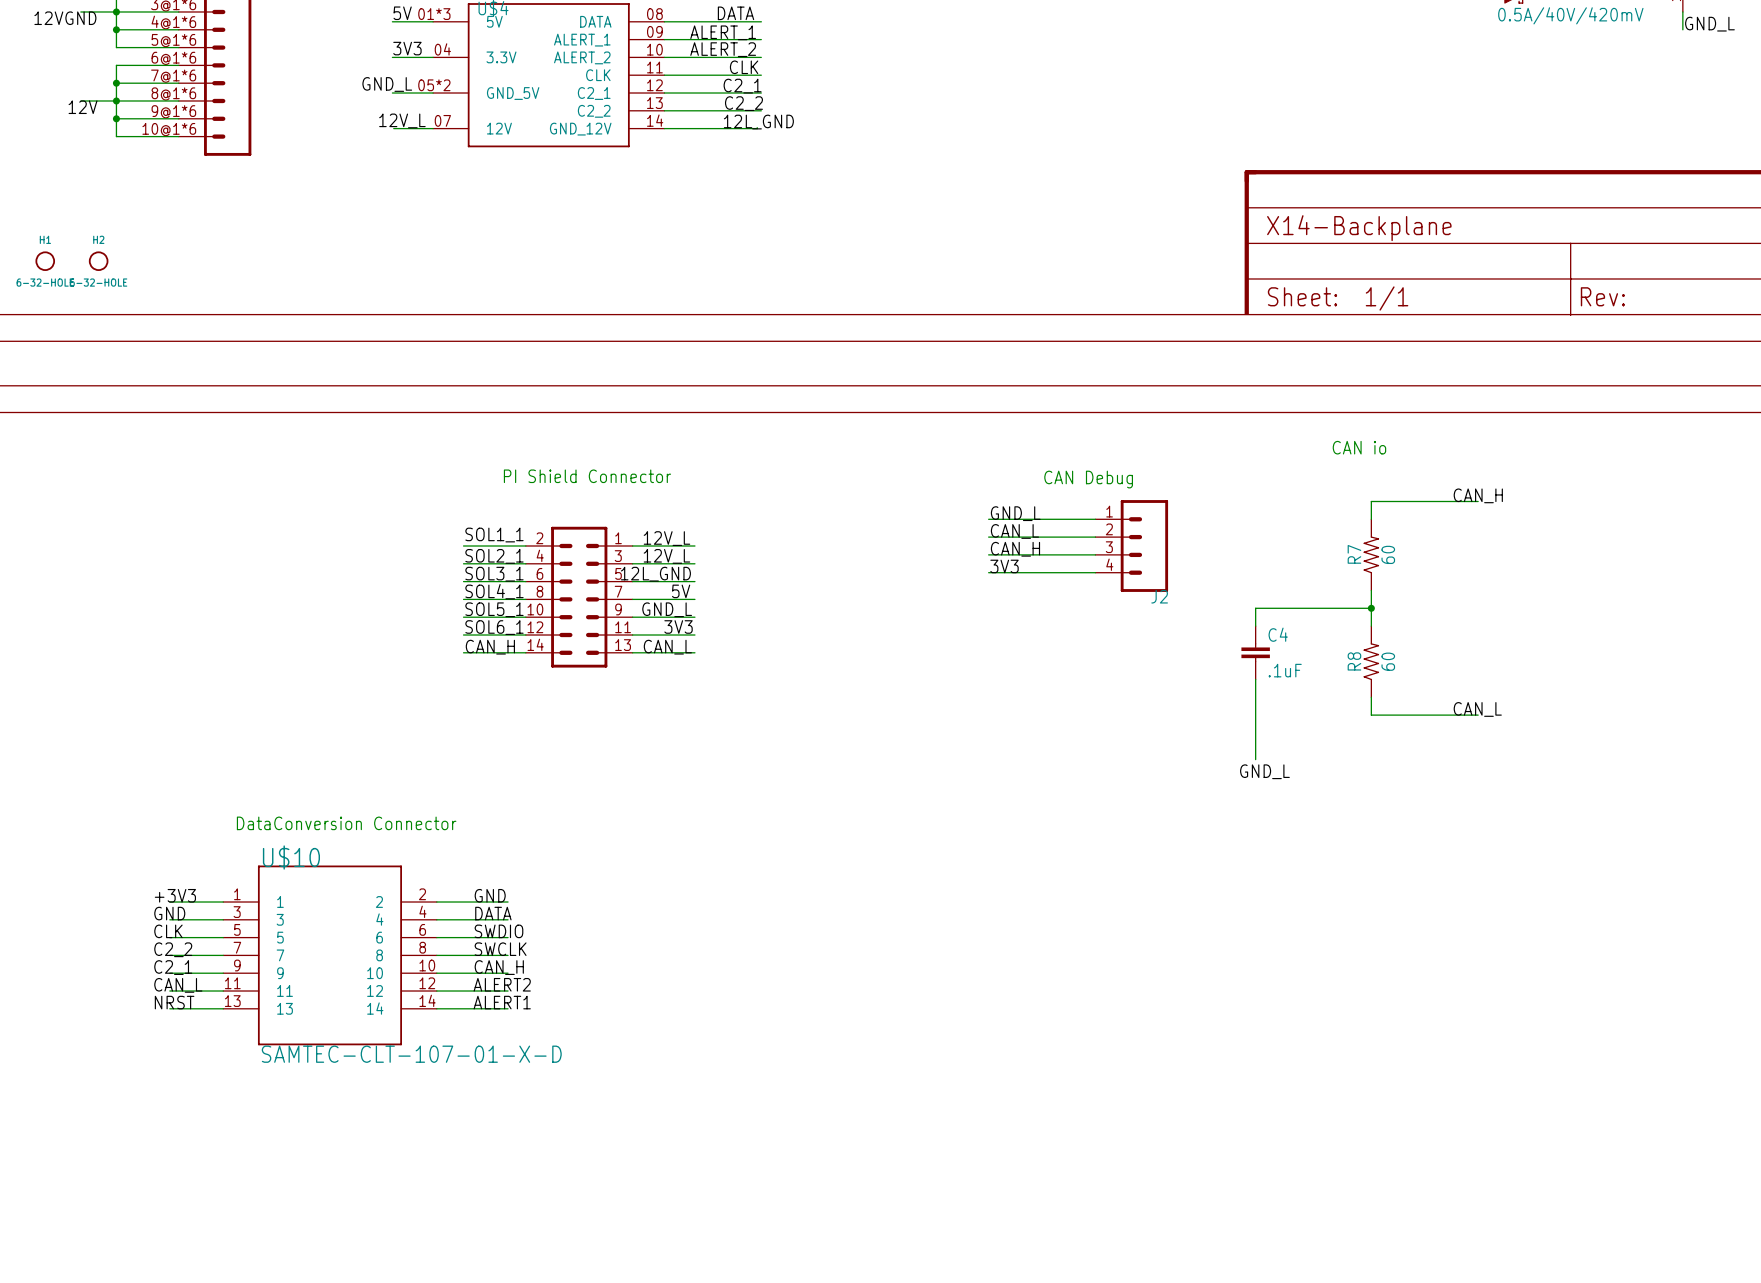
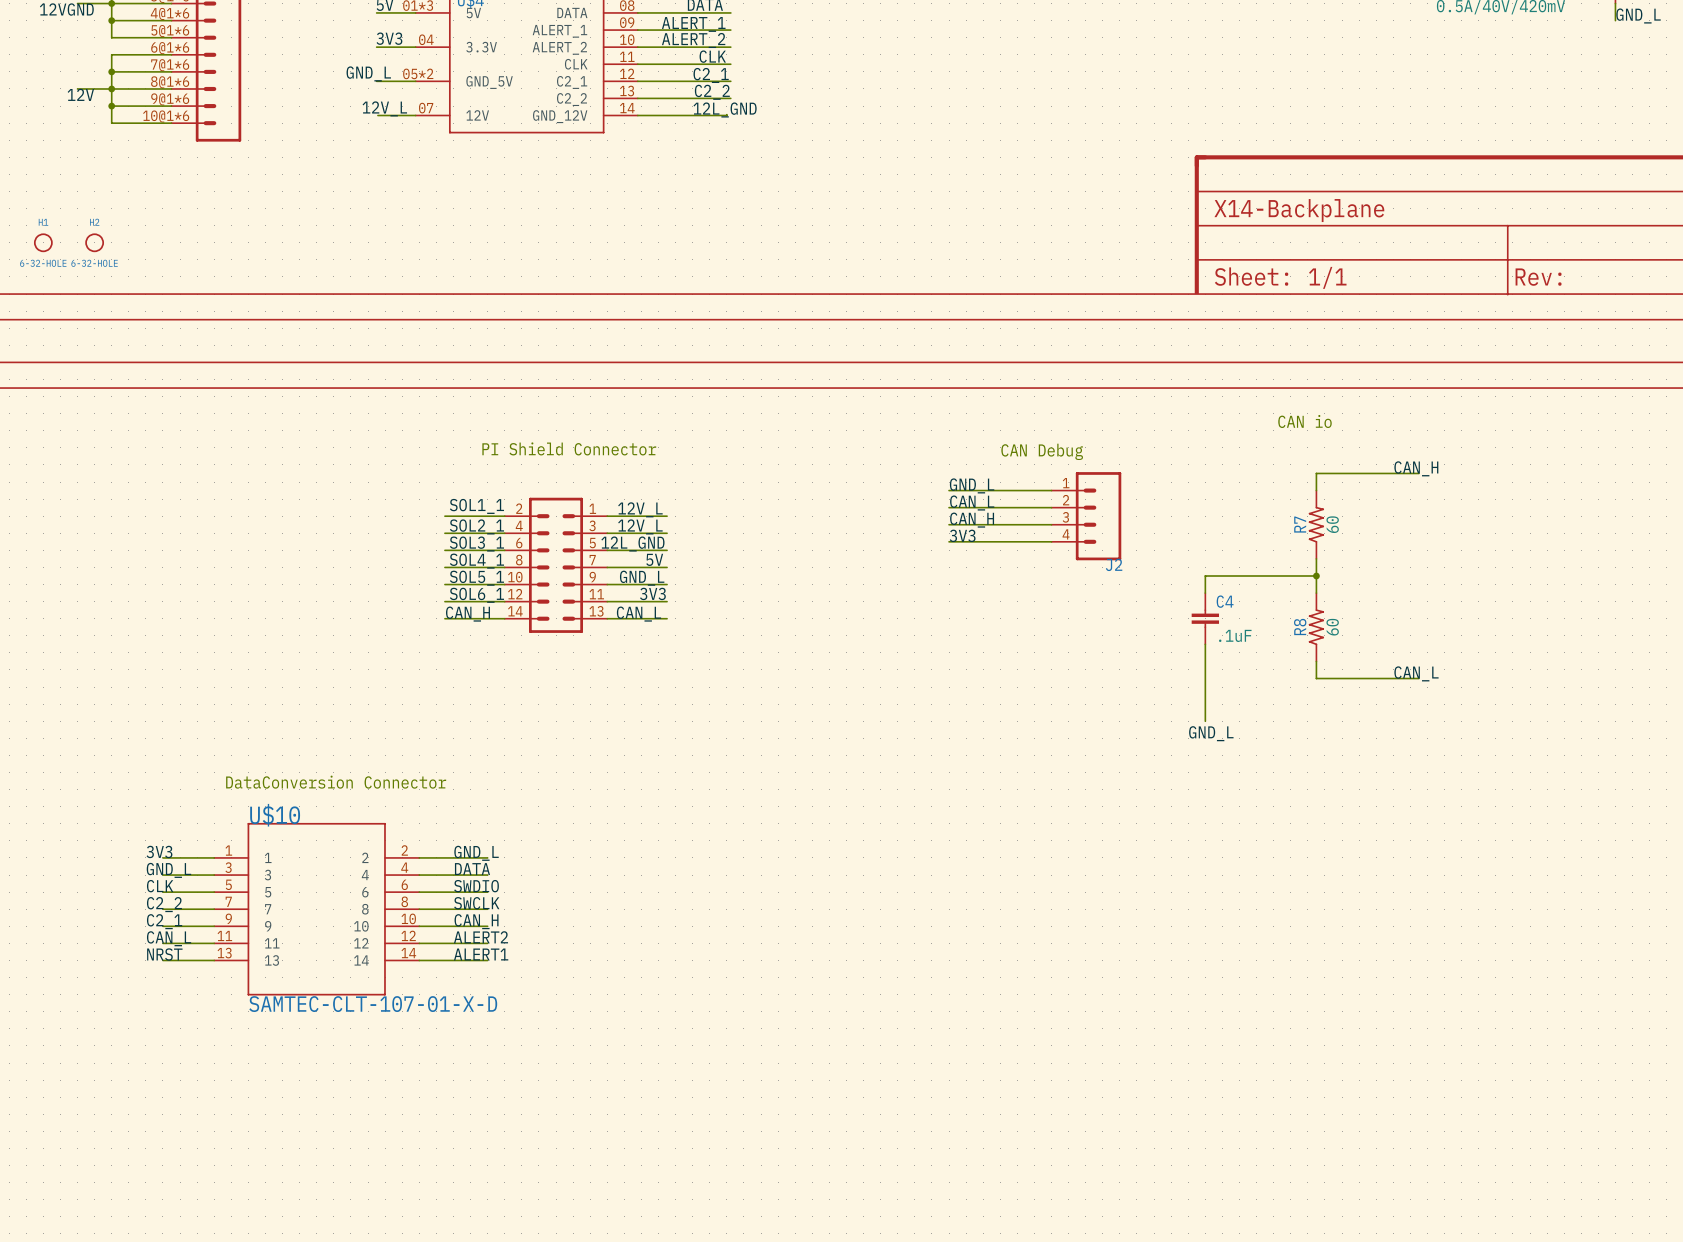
label: +3V3 (175, 895) -> 3V3 (159, 851)
label: GND (490, 895) -> GND_L (476, 853)
label: GND (169, 913) -> GND_L (168, 870)

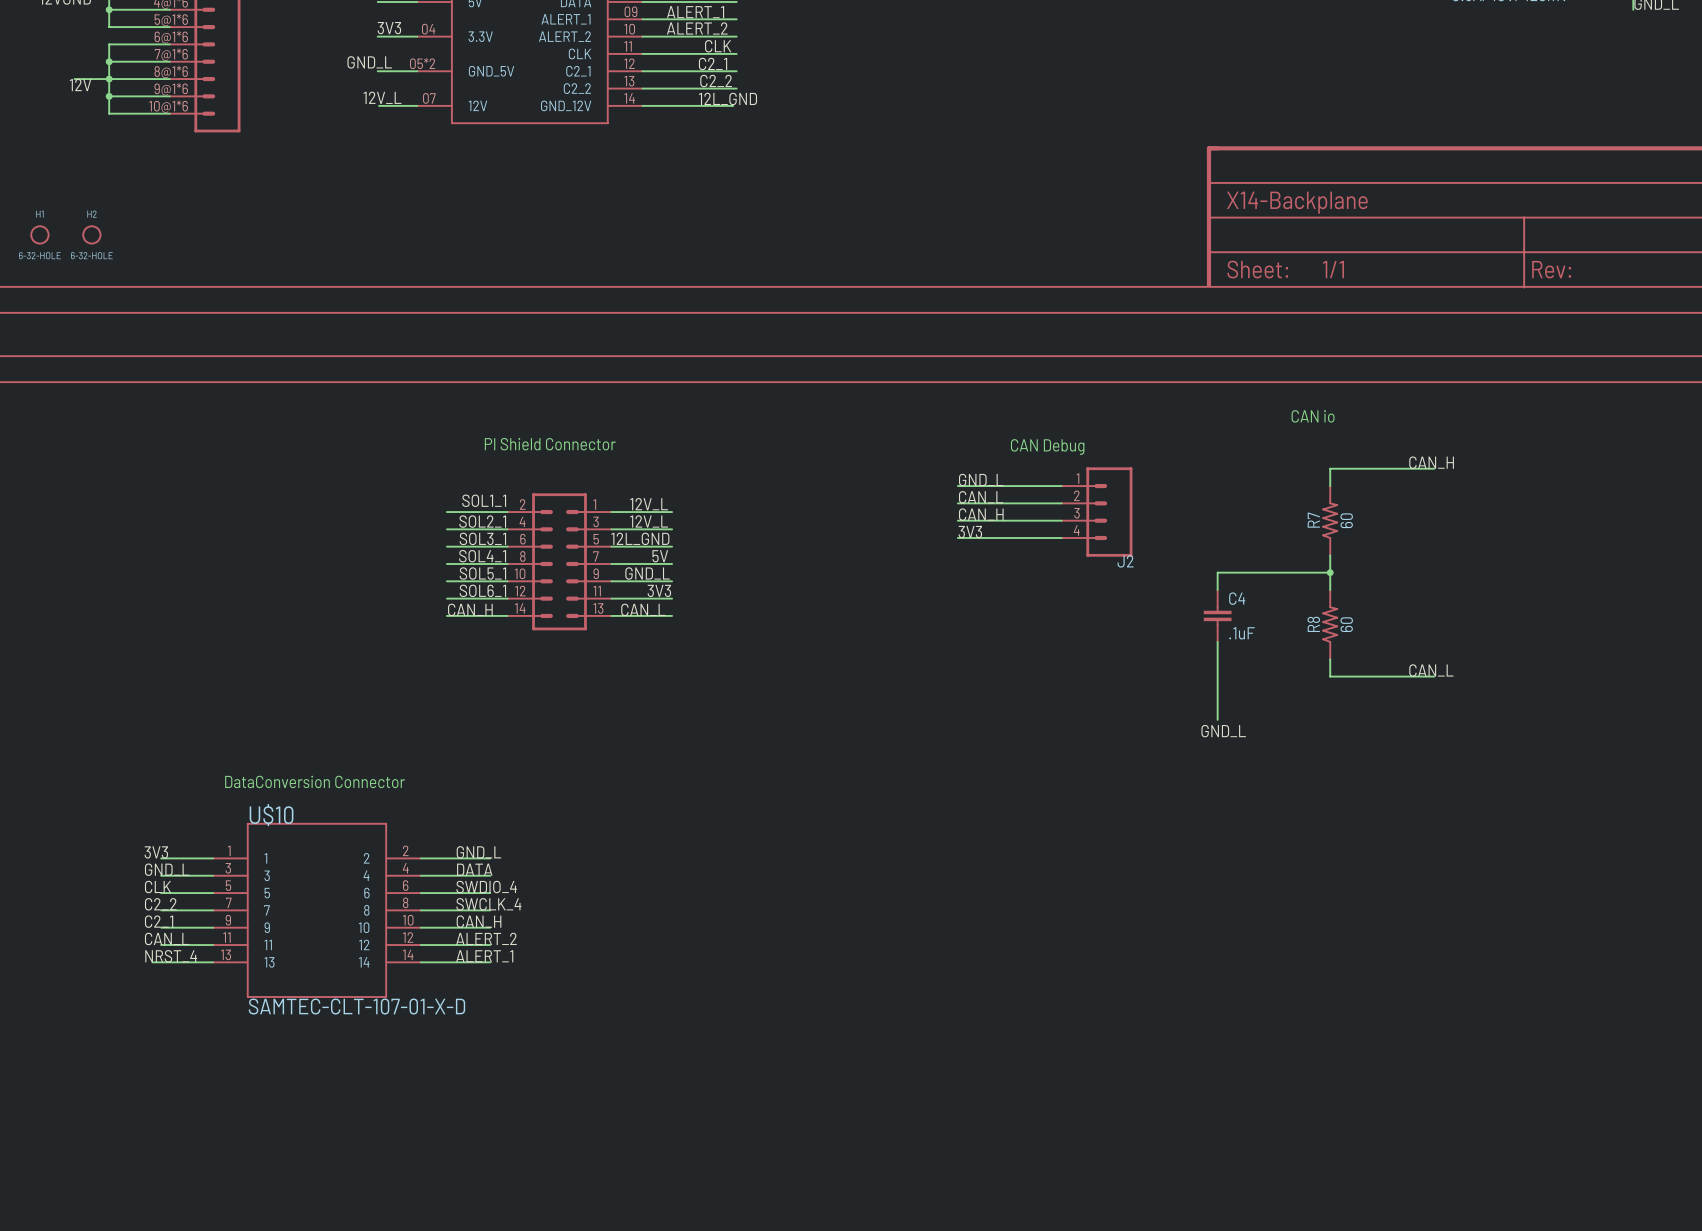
label: SWDIO (476, 886) -> SWDIO_4 (486, 887)
label: SWCLK (476, 903) -> SWCLK_4 (488, 904)
label: ALERT2 (480, 937) -> ALERT_2 (486, 938)
label: NRST (164, 954) -> NRST_4 (171, 956)
label: ALERT1 (481, 954) -> ALERT_1 (484, 956)
wire: none -> (152, 962) (161, 962)

